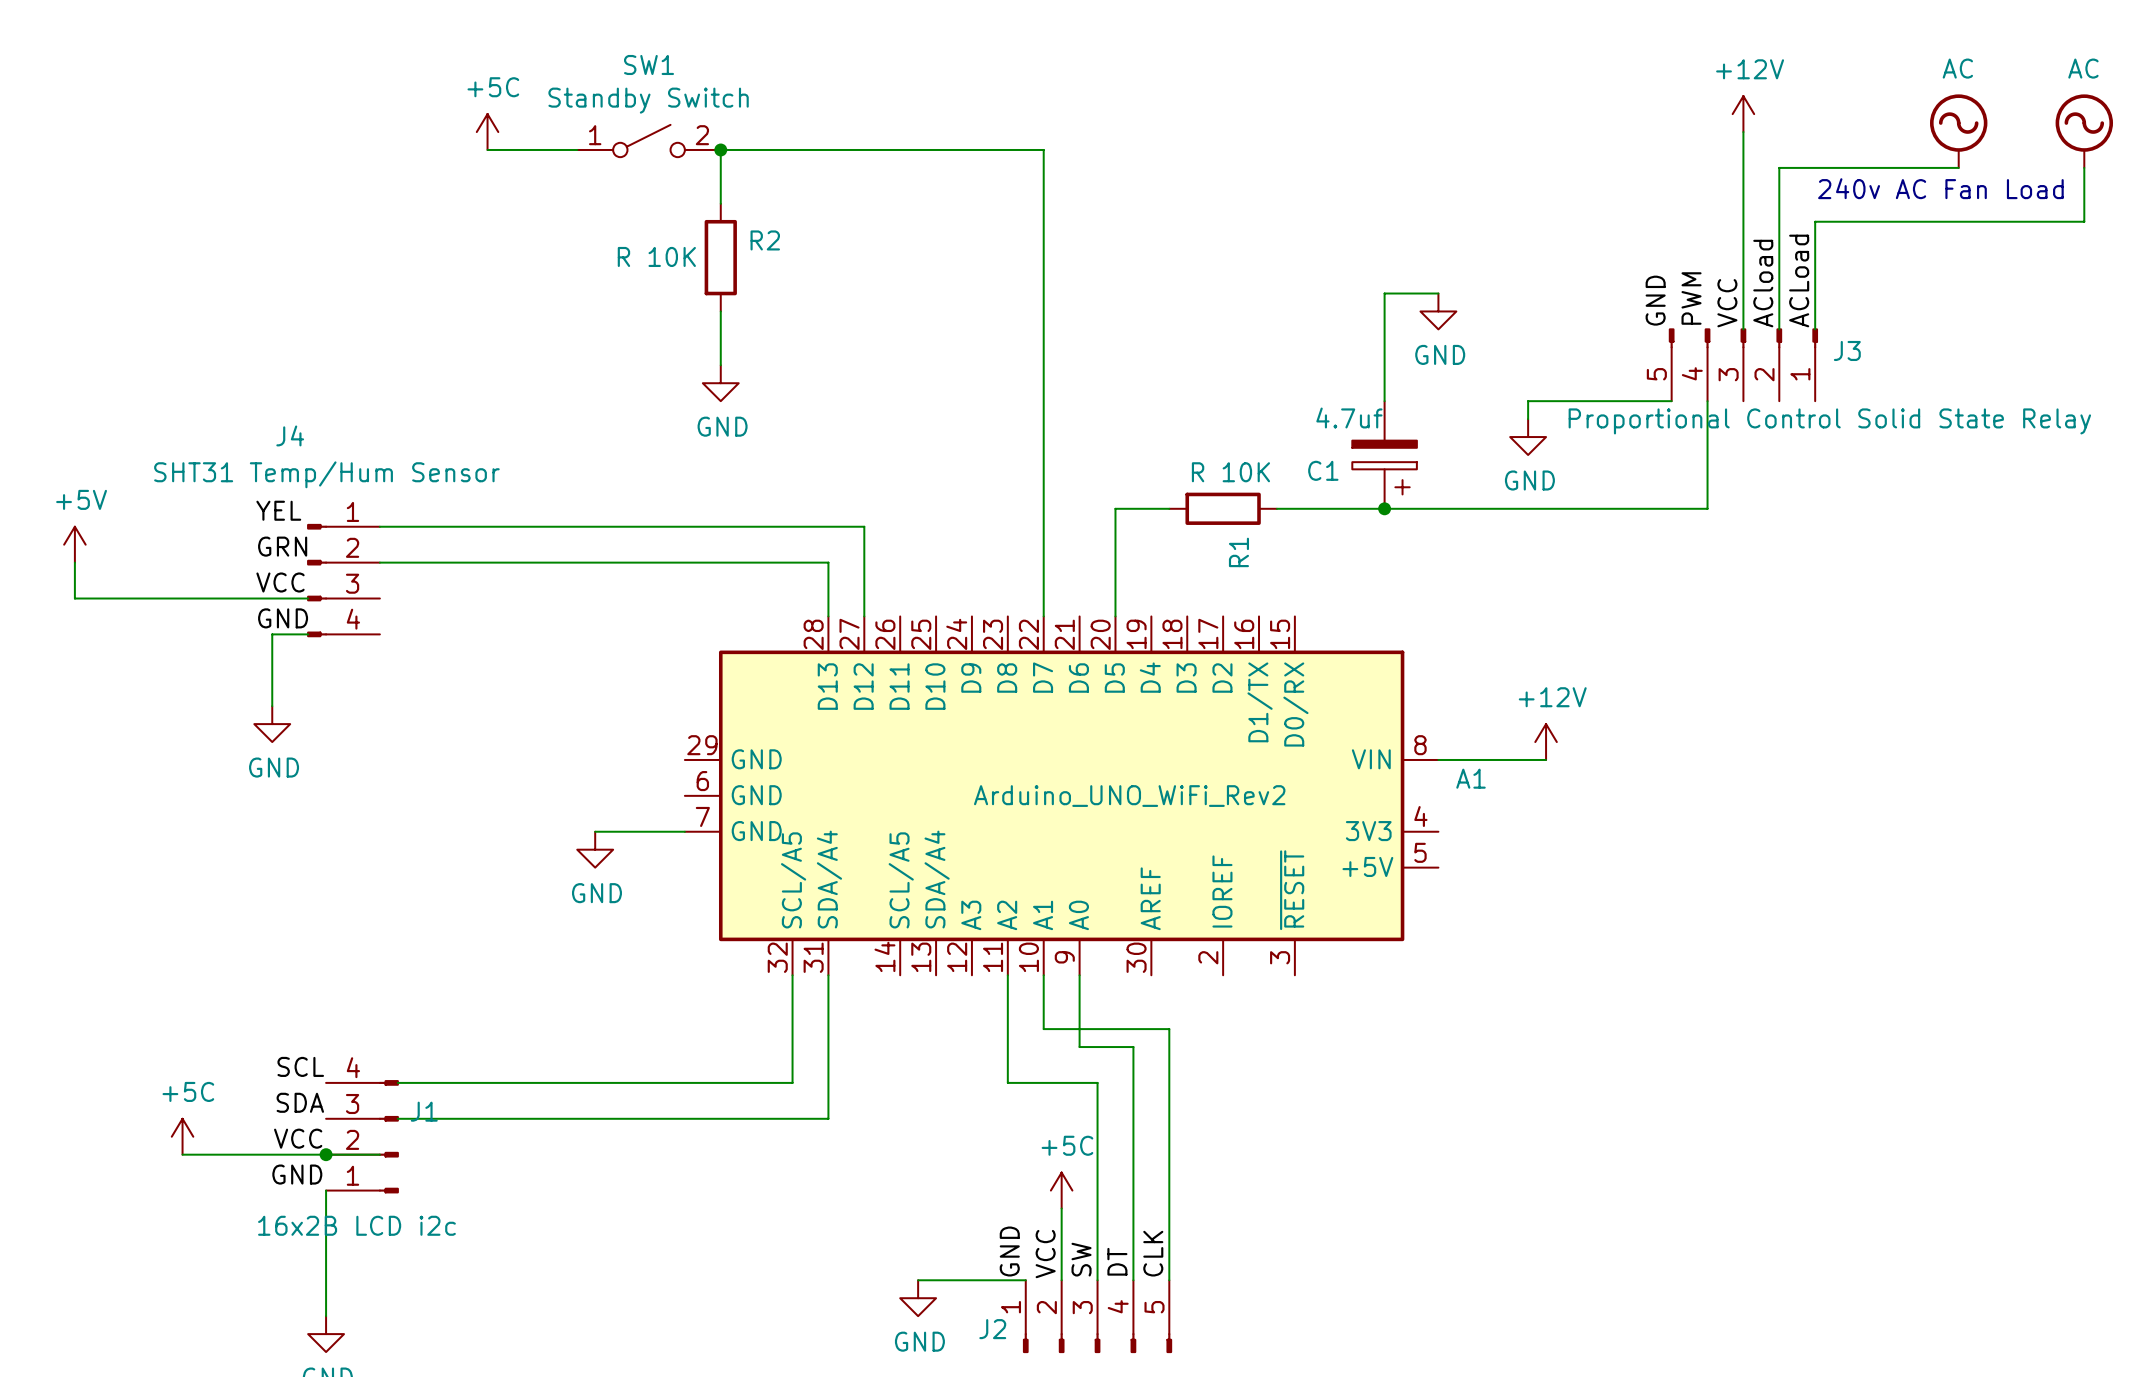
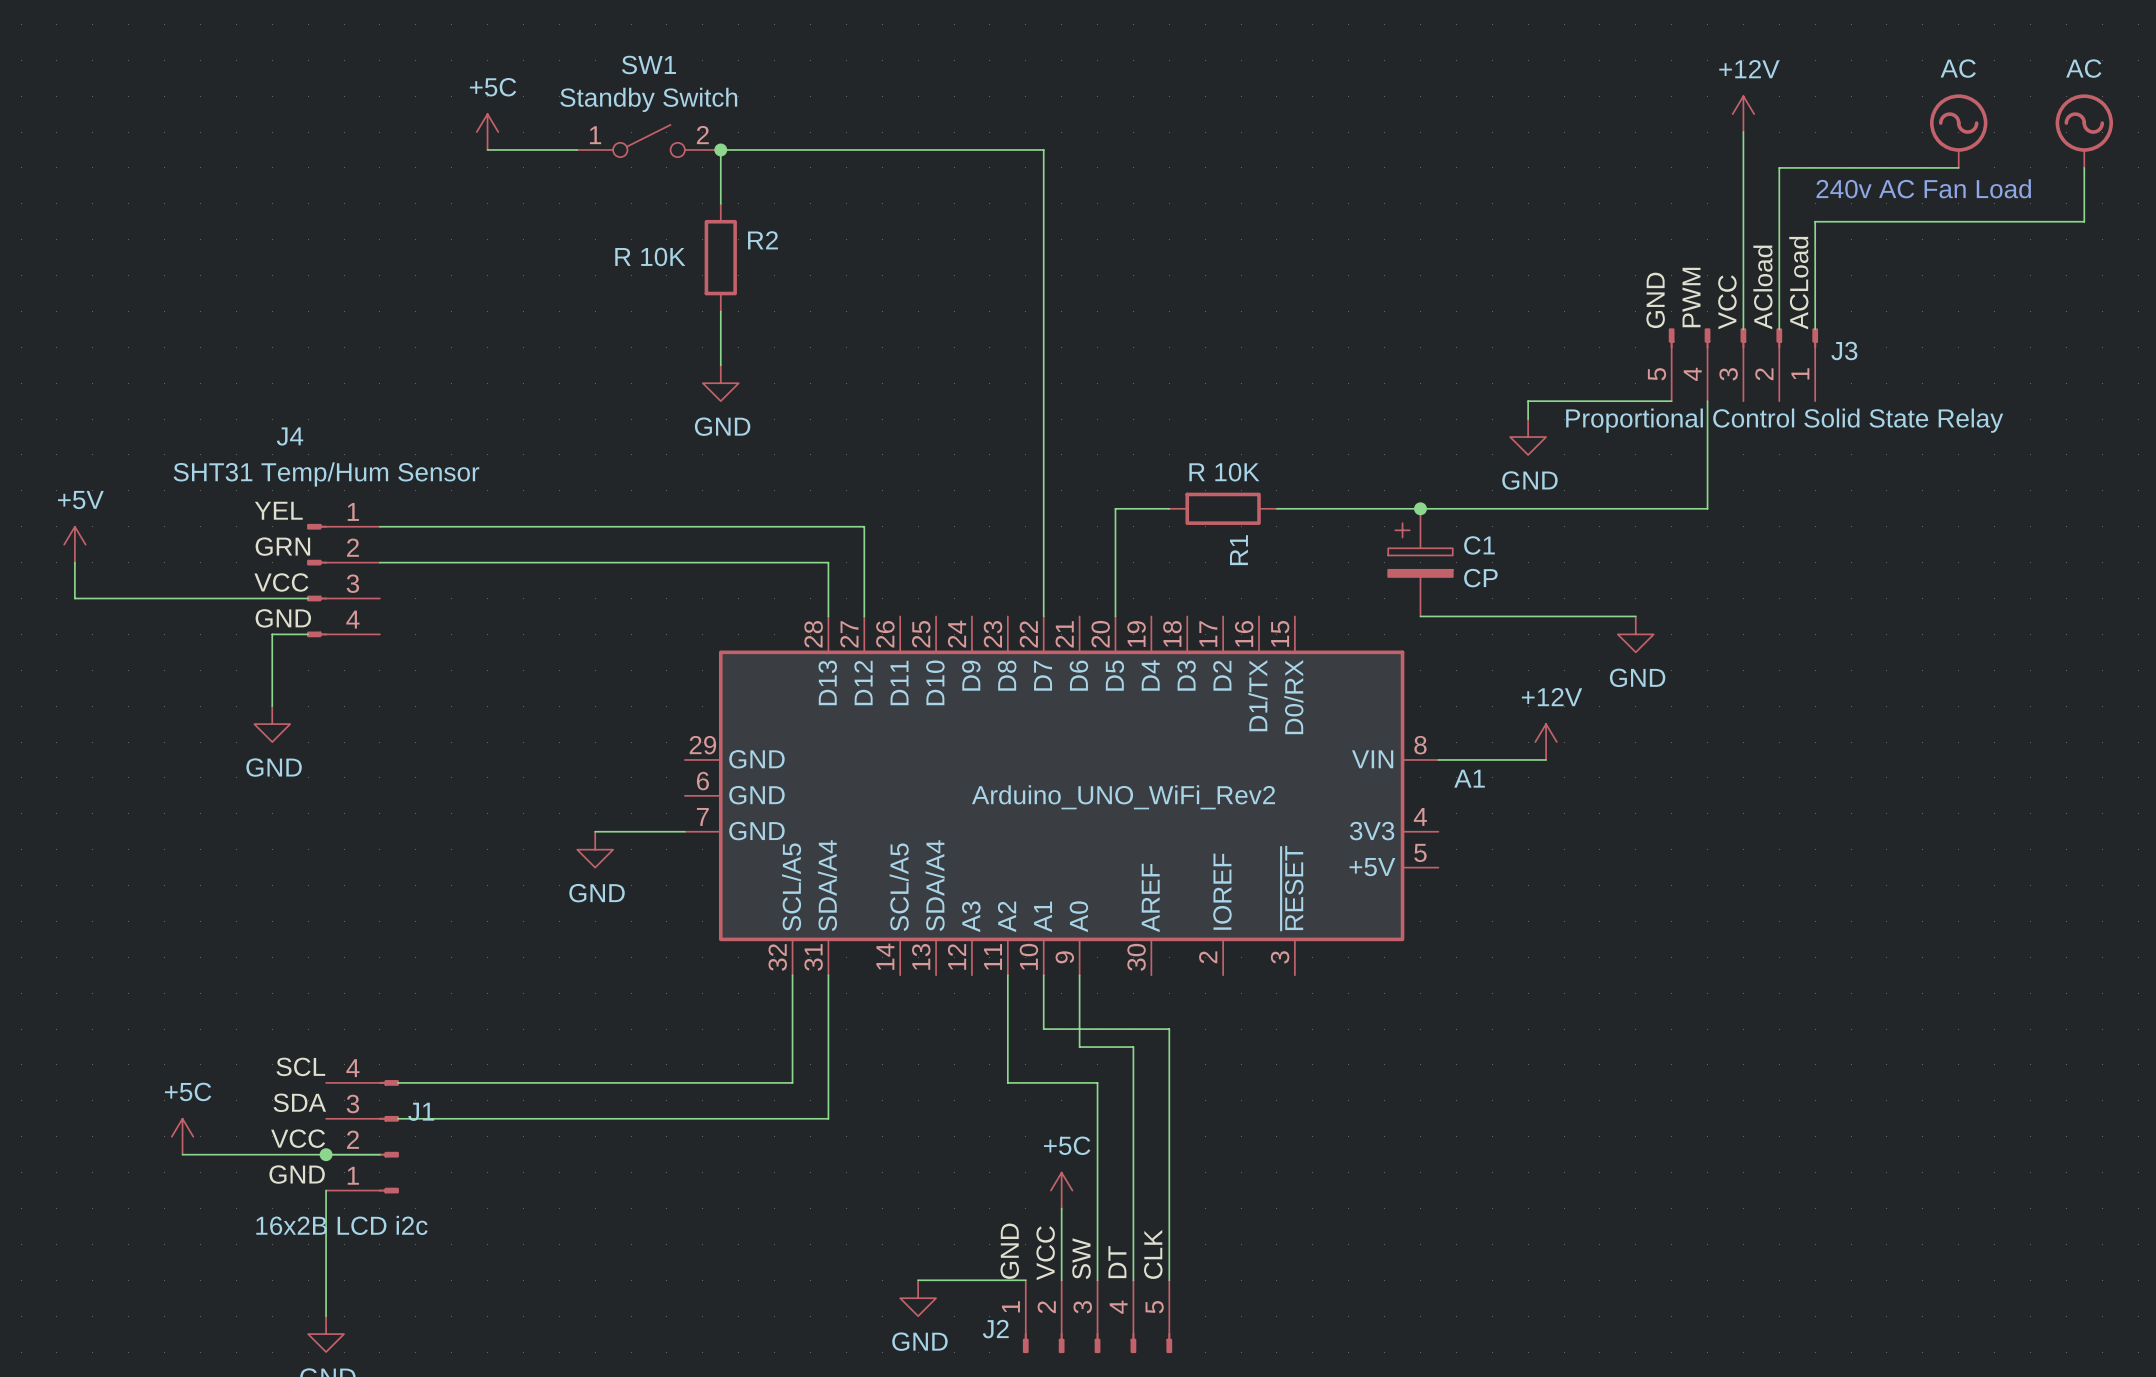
wire: (1438, 293) (1384, 293) (1384, 401) -> none
power symbol: GND (1438, 311) -> none
C1 value: 4.7uf (1349, 418) -> CP (1480, 578)
C1 position: (1384, 454) -> (1420, 562)
C1 rotation: 0° (1384, 467) -> 180° (1420, 550)
junction position: (1384, 508) -> (1420, 508)
wire: none -> (1420, 616) (1635, 616)
power symbol: none -> GND (1635, 634)

